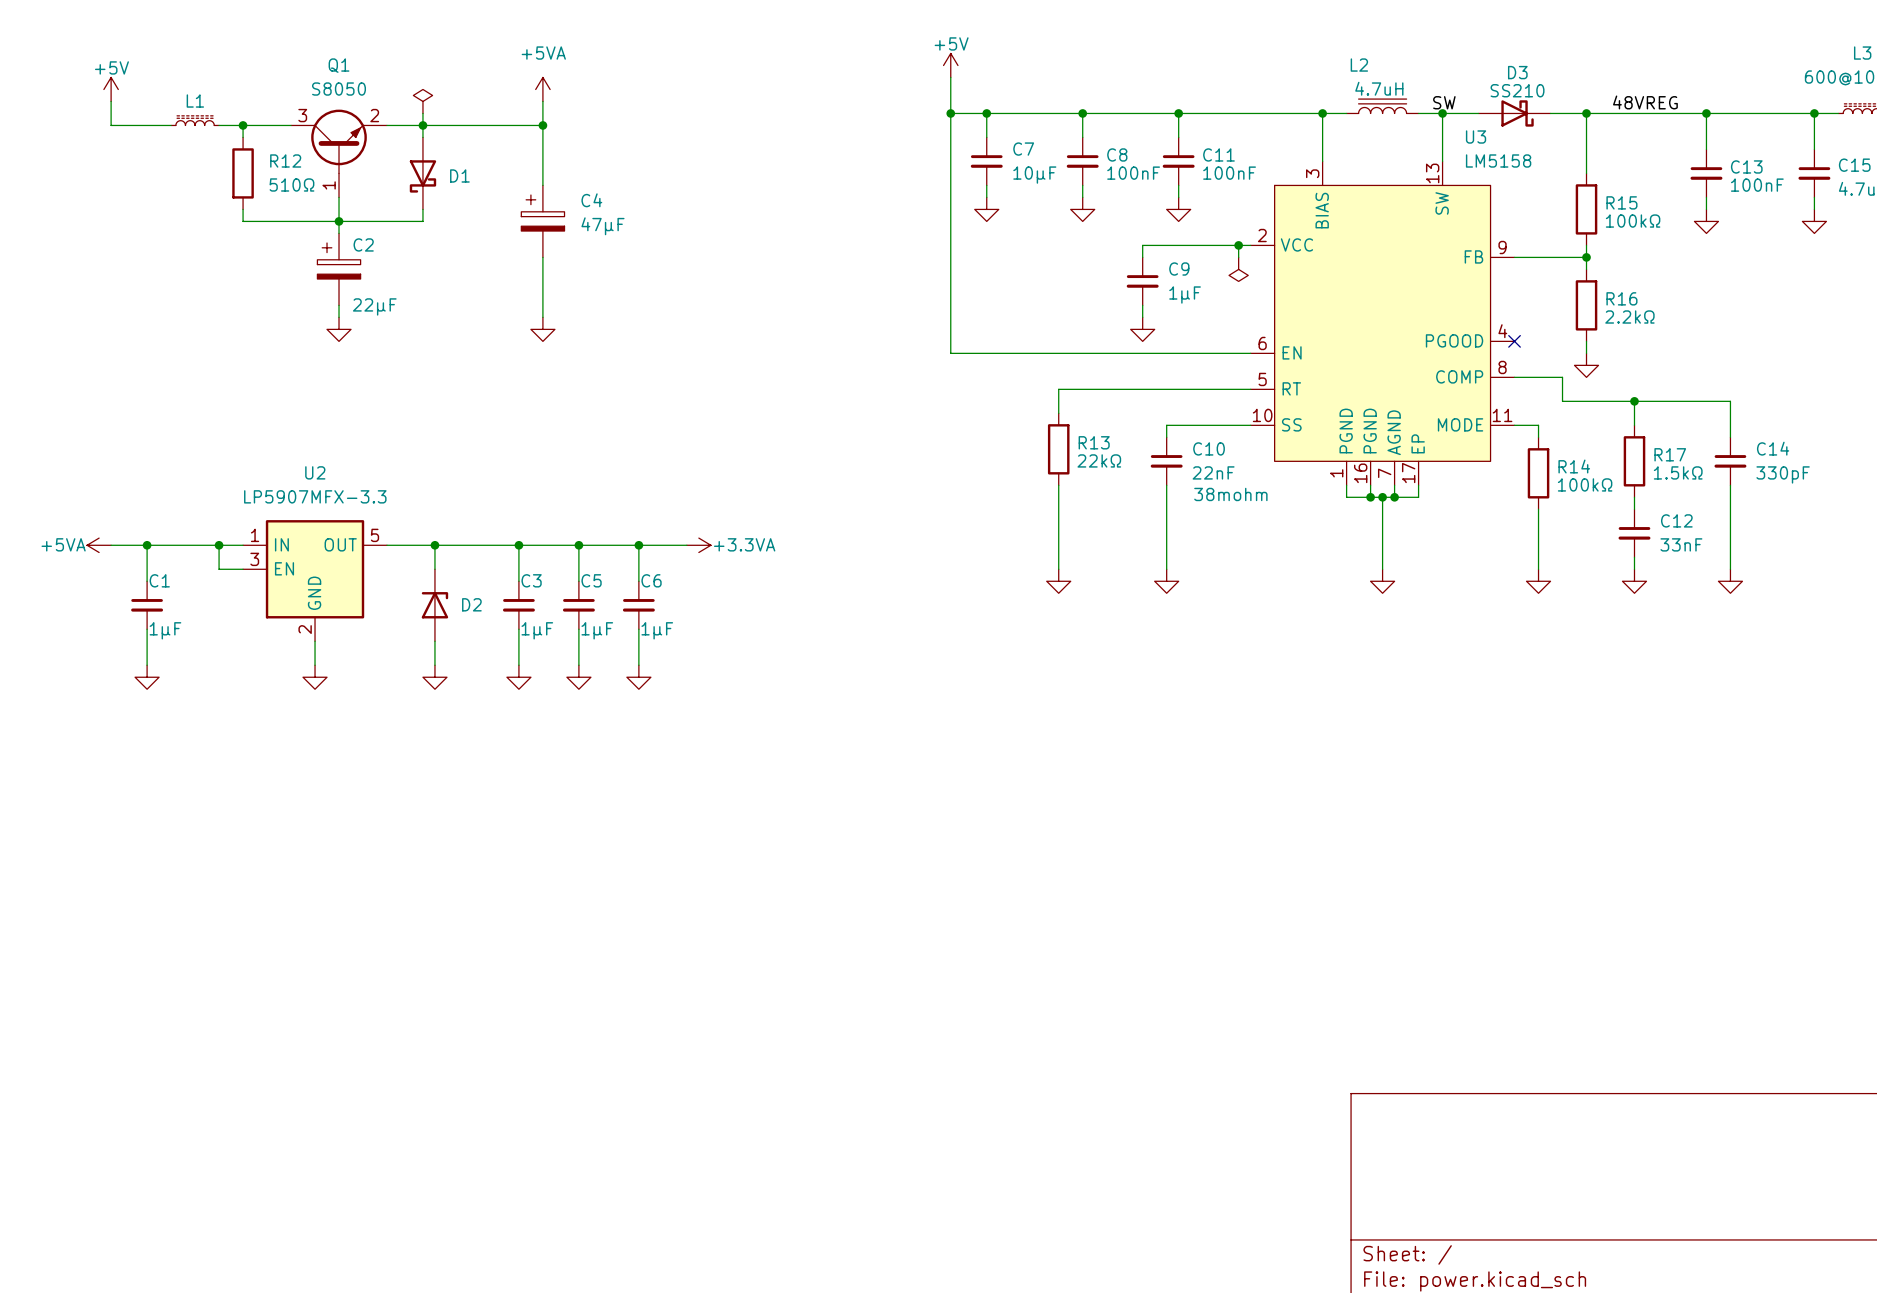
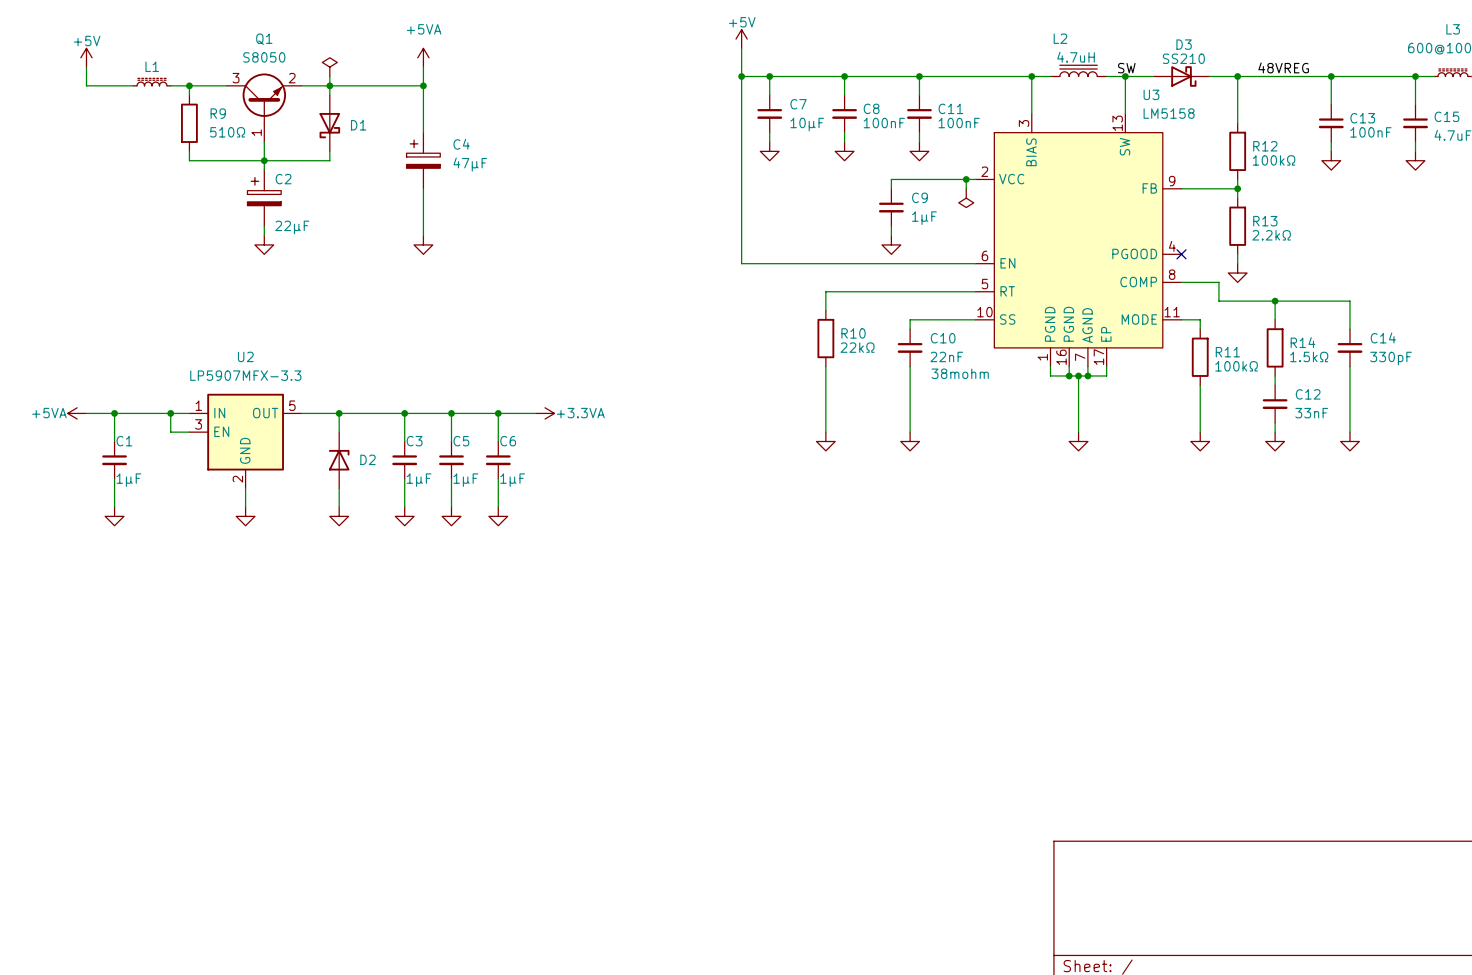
R12 name: R12 (285, 160) -> R9 (218, 113)
R15 name: R15 (1621, 202) -> R12 (1265, 146)
R16 name: R16 (1621, 298) -> R13 (1265, 221)
R13 name: R13 (1094, 442) -> R10 (853, 333)
R17 name: R17 (1670, 454) -> R14 (1302, 342)
R14 name: R14 (1574, 466) -> R11 (1227, 352)

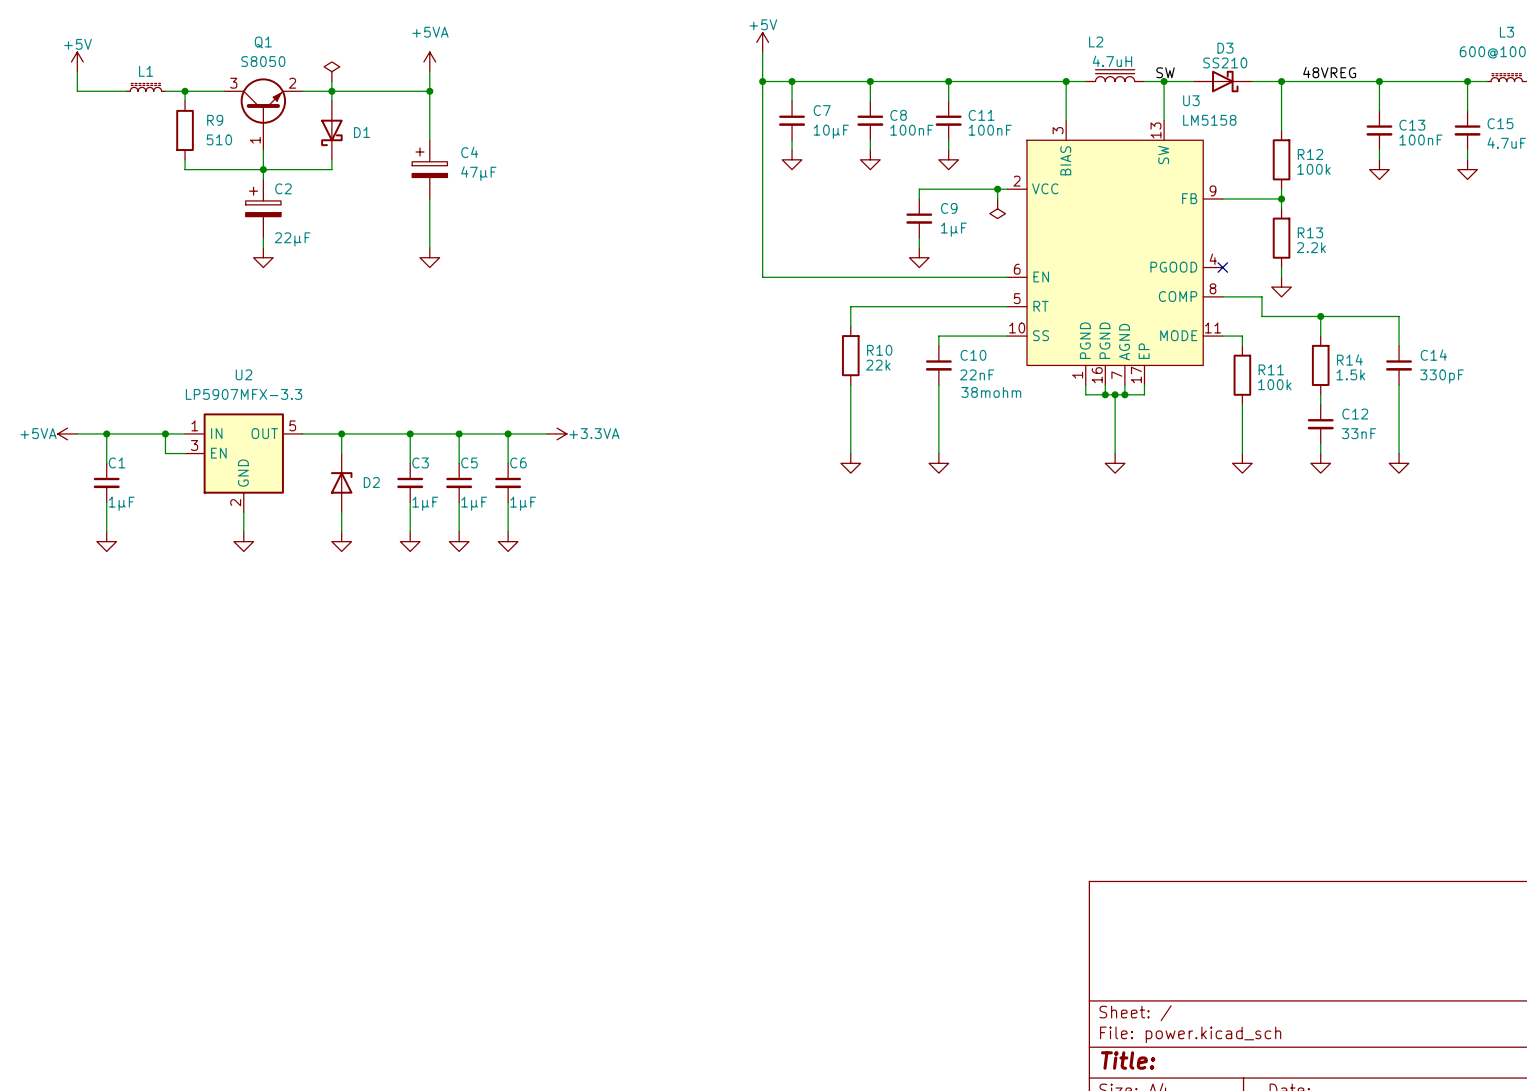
R9 value: 510Ω (227, 132) -> 510 (219, 139)
R12 value: 100kΩ (1274, 160) -> 100k (1313, 169)
R13 value: 2.2kΩ (1271, 235) -> 2.2k (1311, 247)
R10 value: 22kΩ (857, 347) -> 22k (878, 365)
R14 value: 1.5kΩ (1309, 356) -> 1.5k (1350, 374)
R11 value: 100kΩ (1236, 366) -> 100k (1274, 384)

